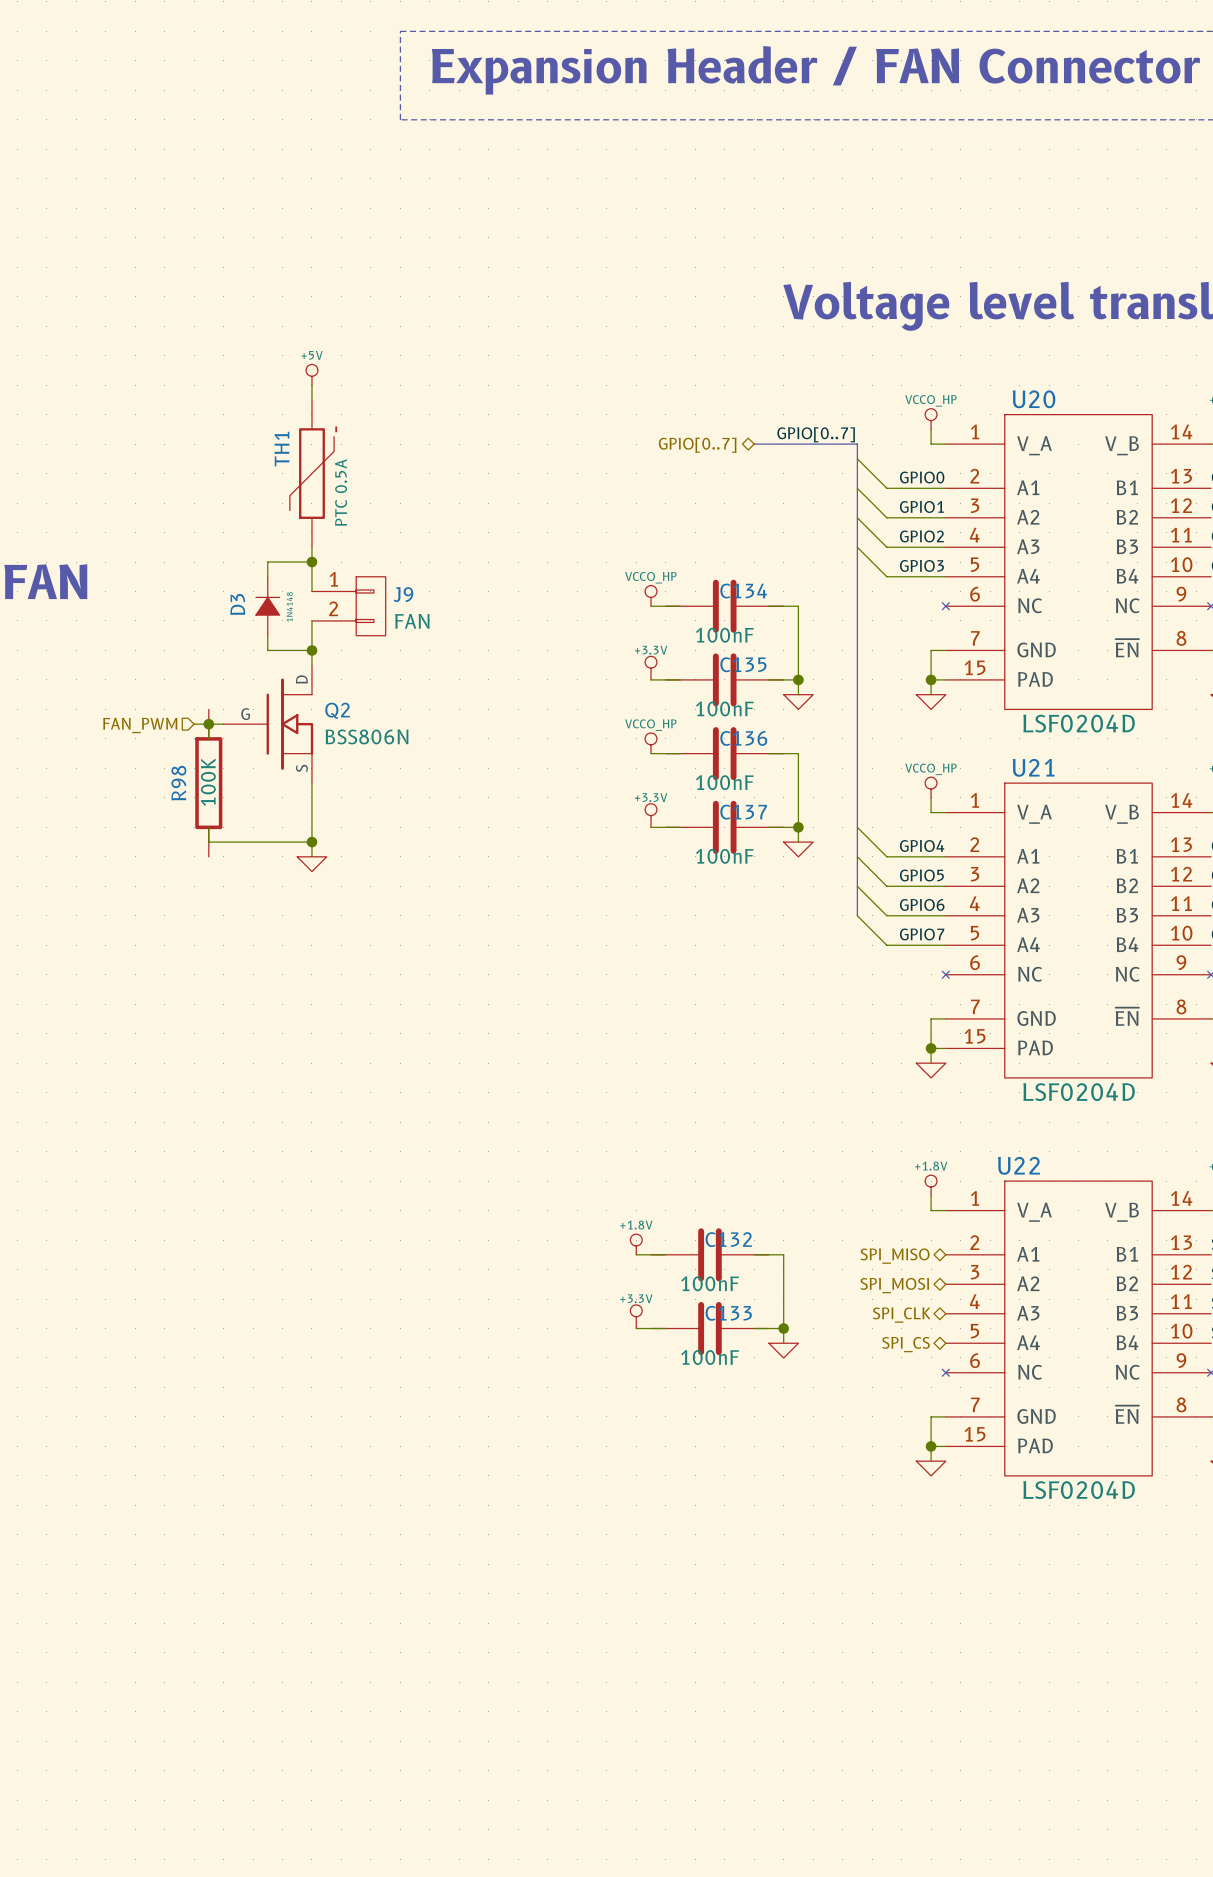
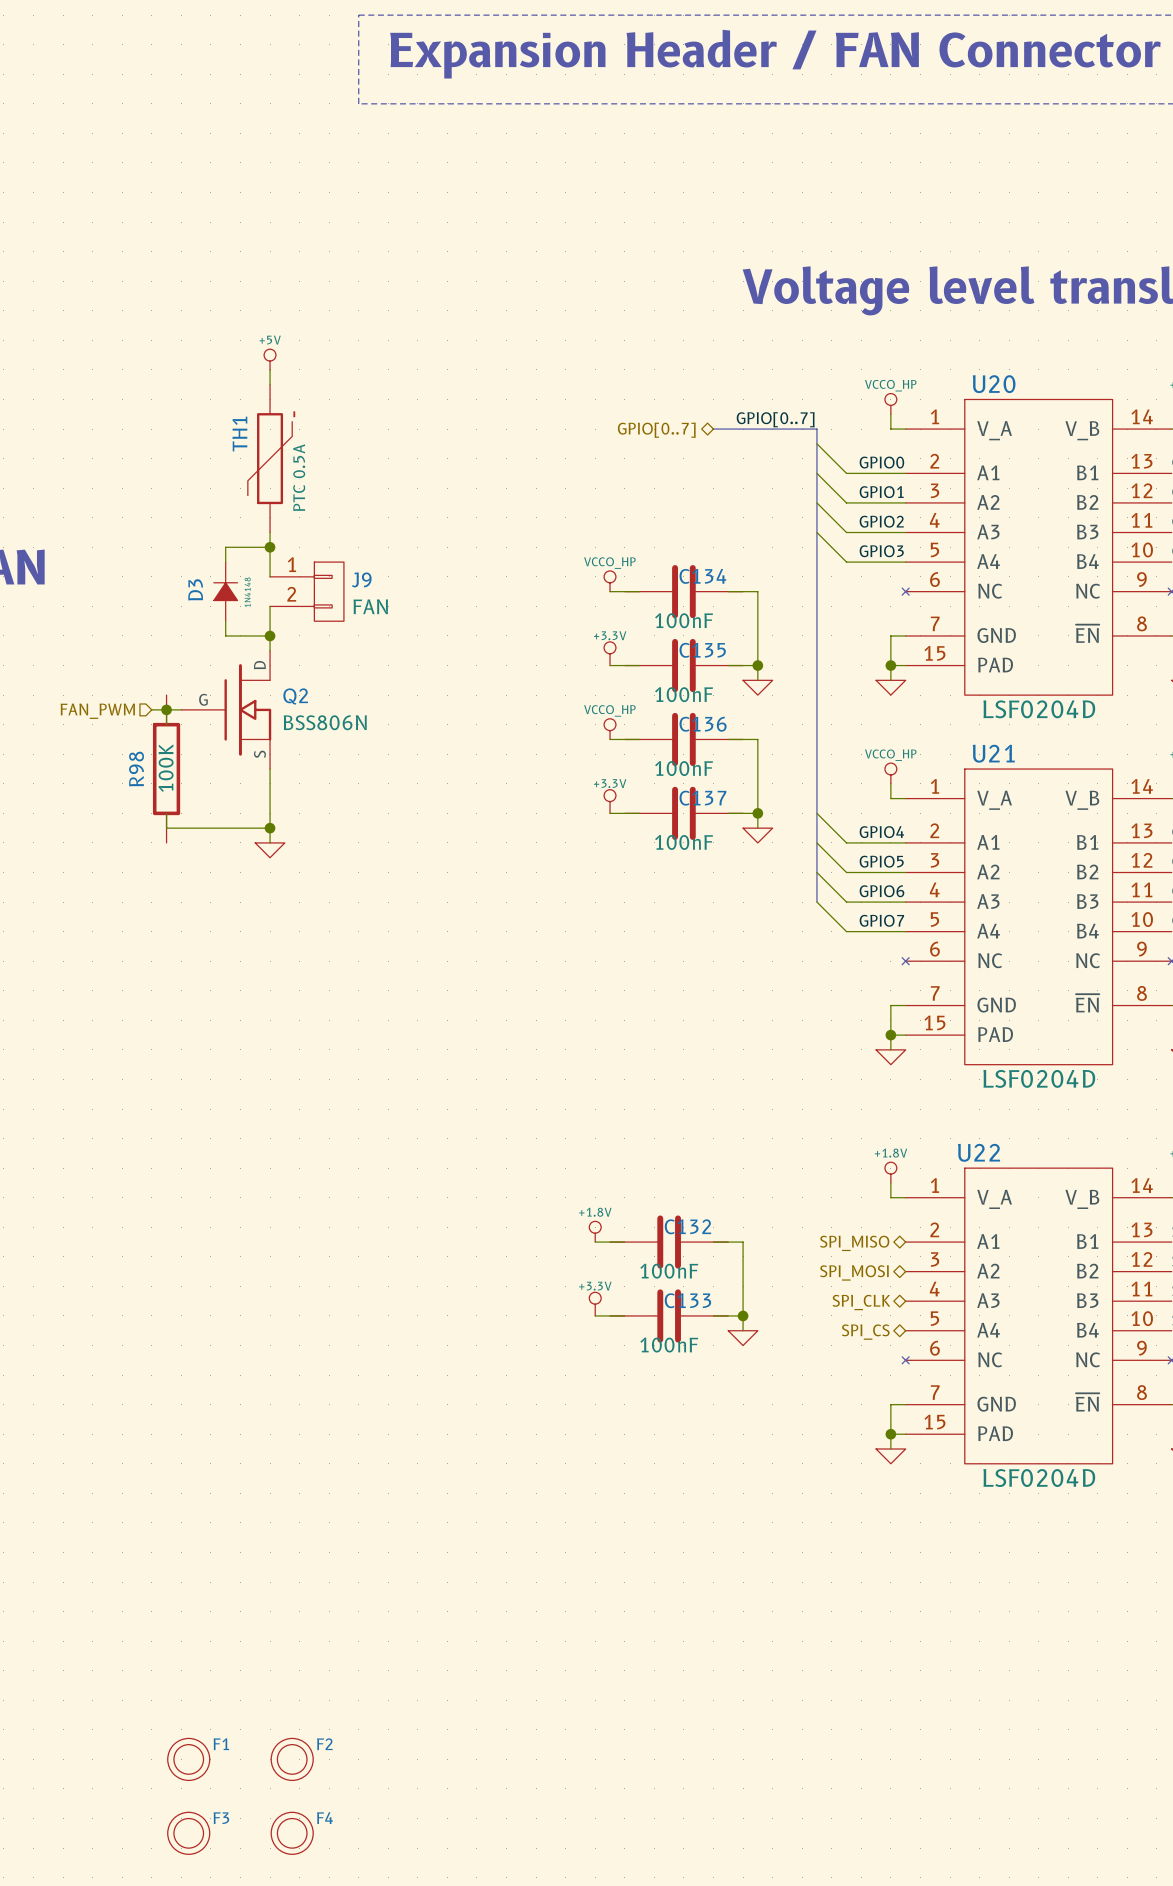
F1: none -> (188, 1759)
F2: none -> (292, 1759)
F3: none -> (188, 1833)
F4: none -> (292, 1833)

